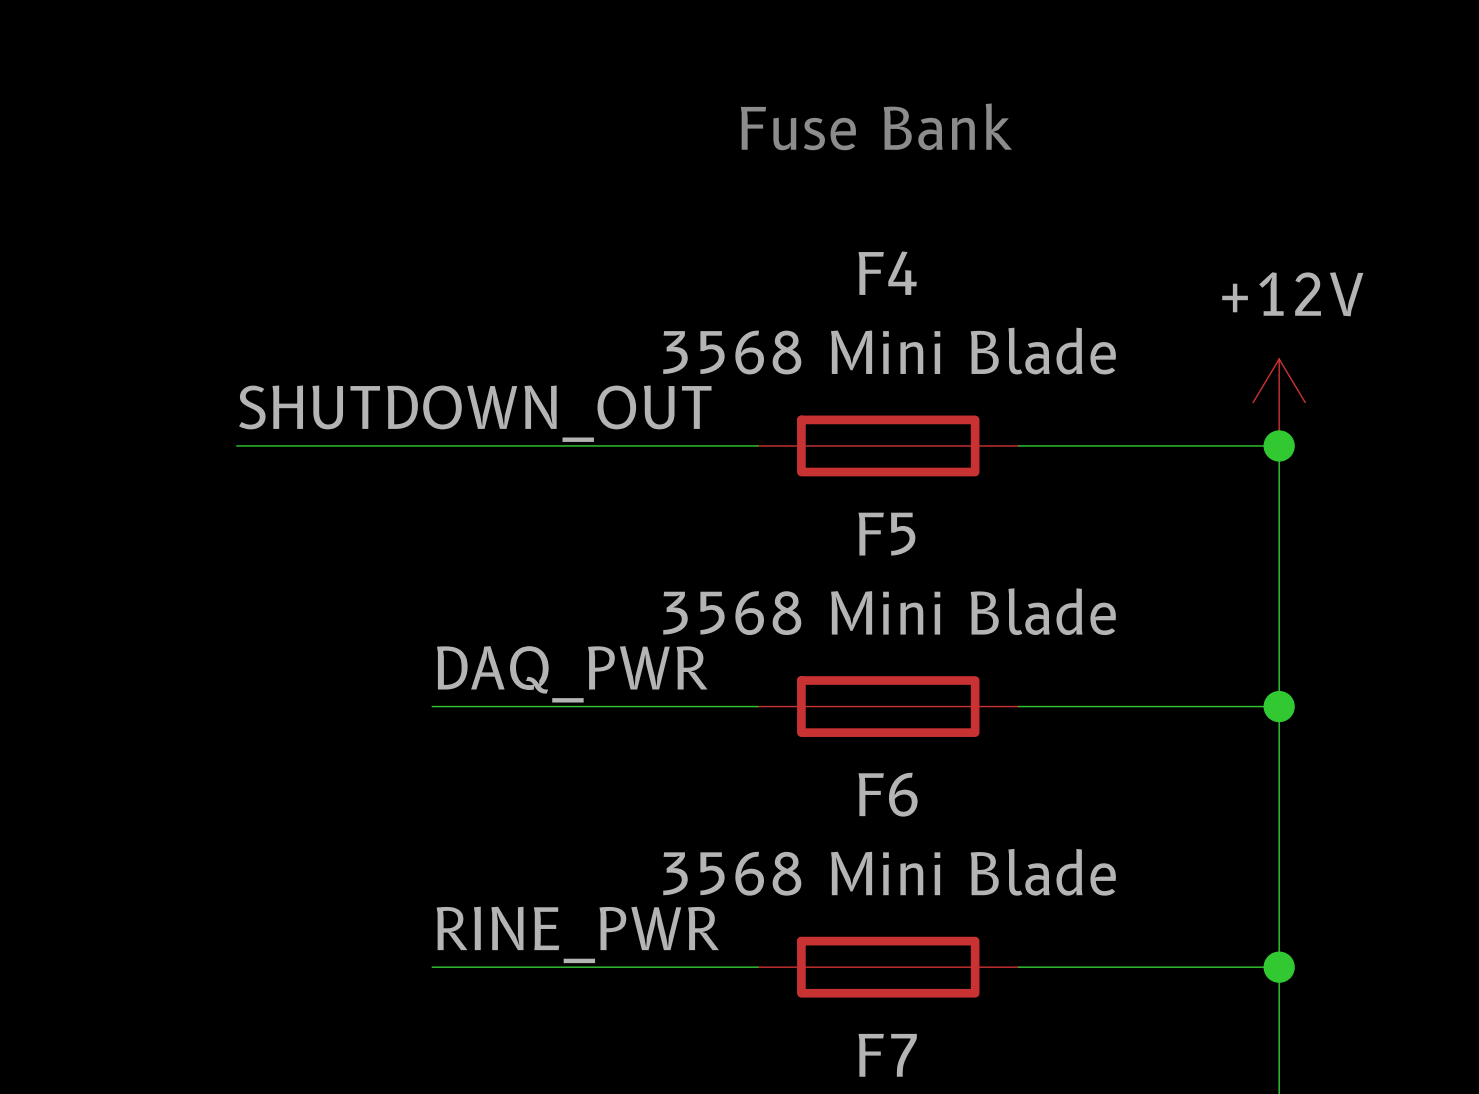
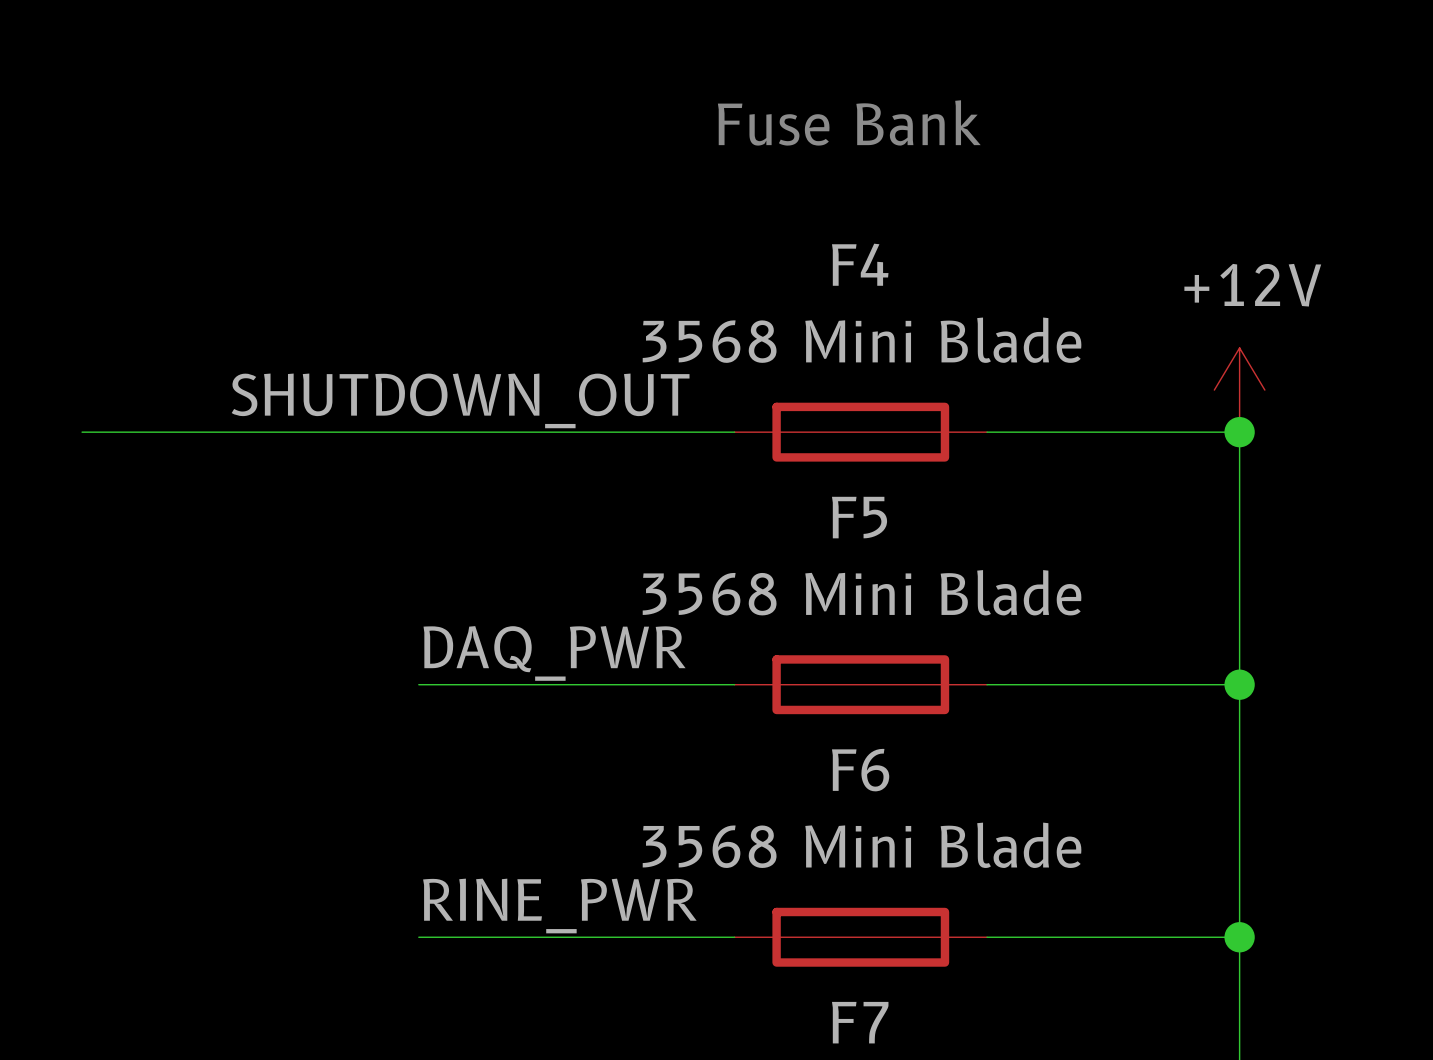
wire: none -> (82, 432) (229, 432)

